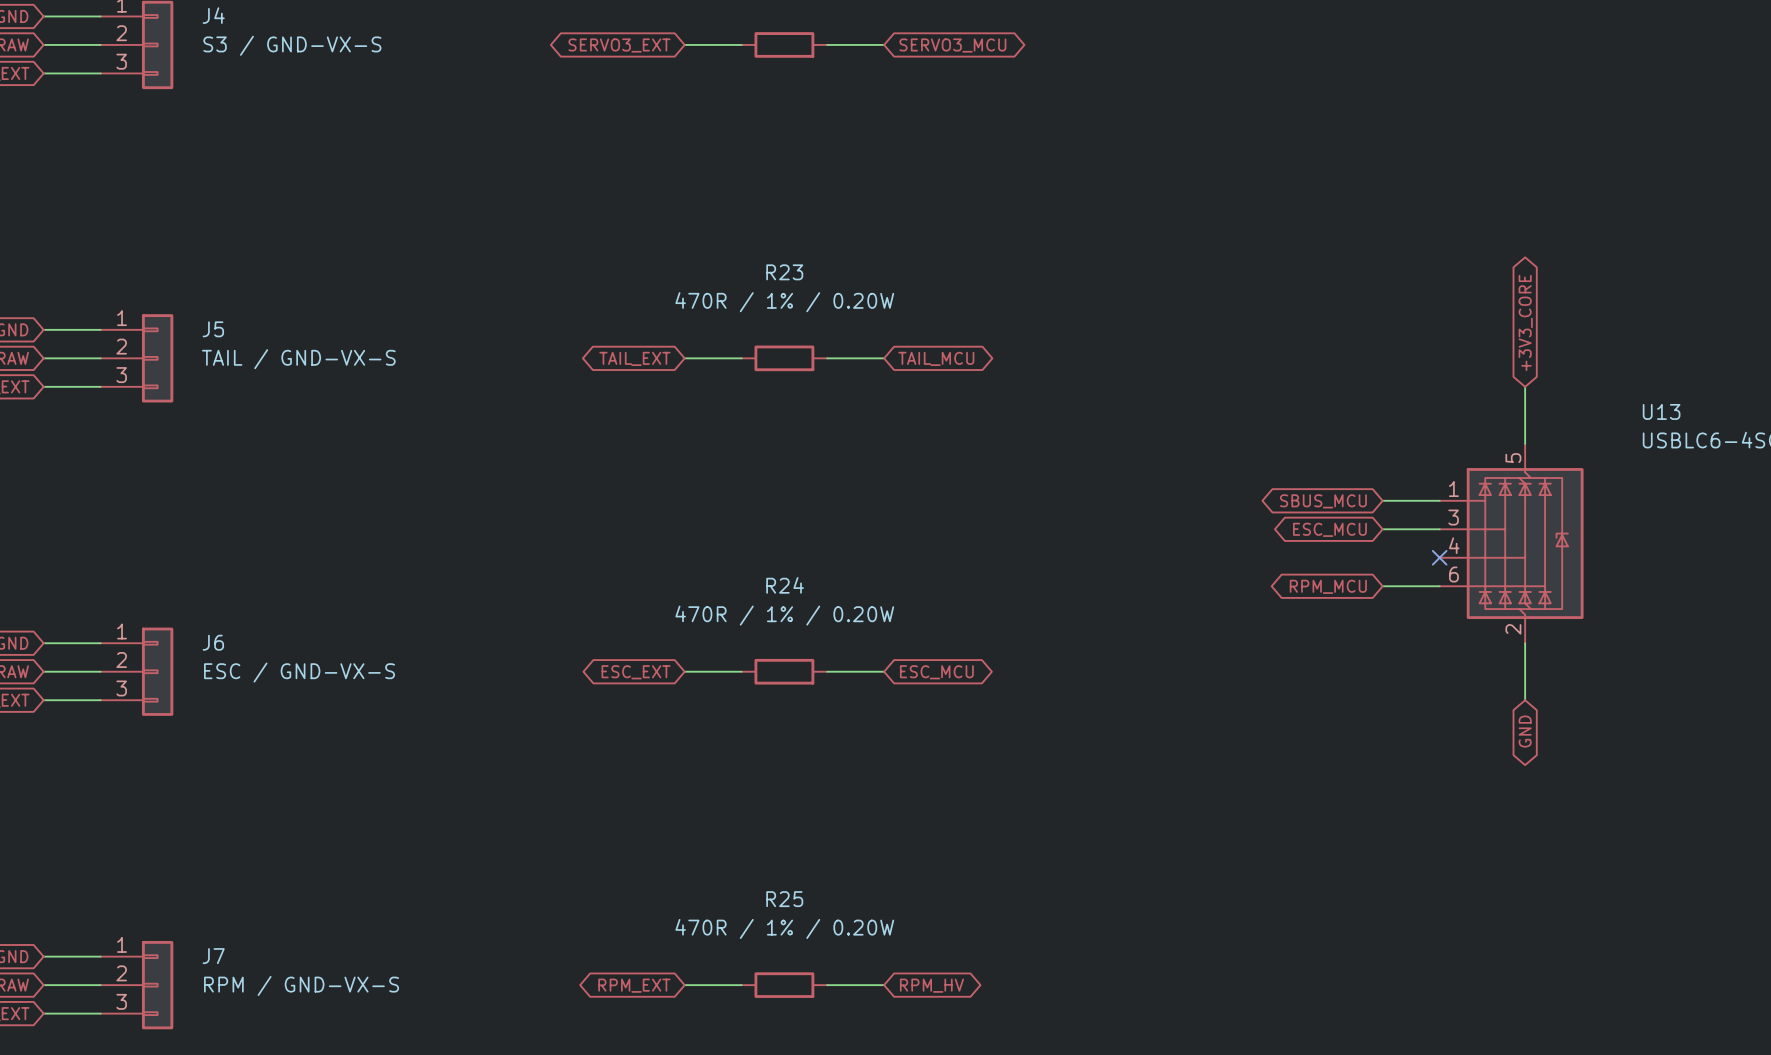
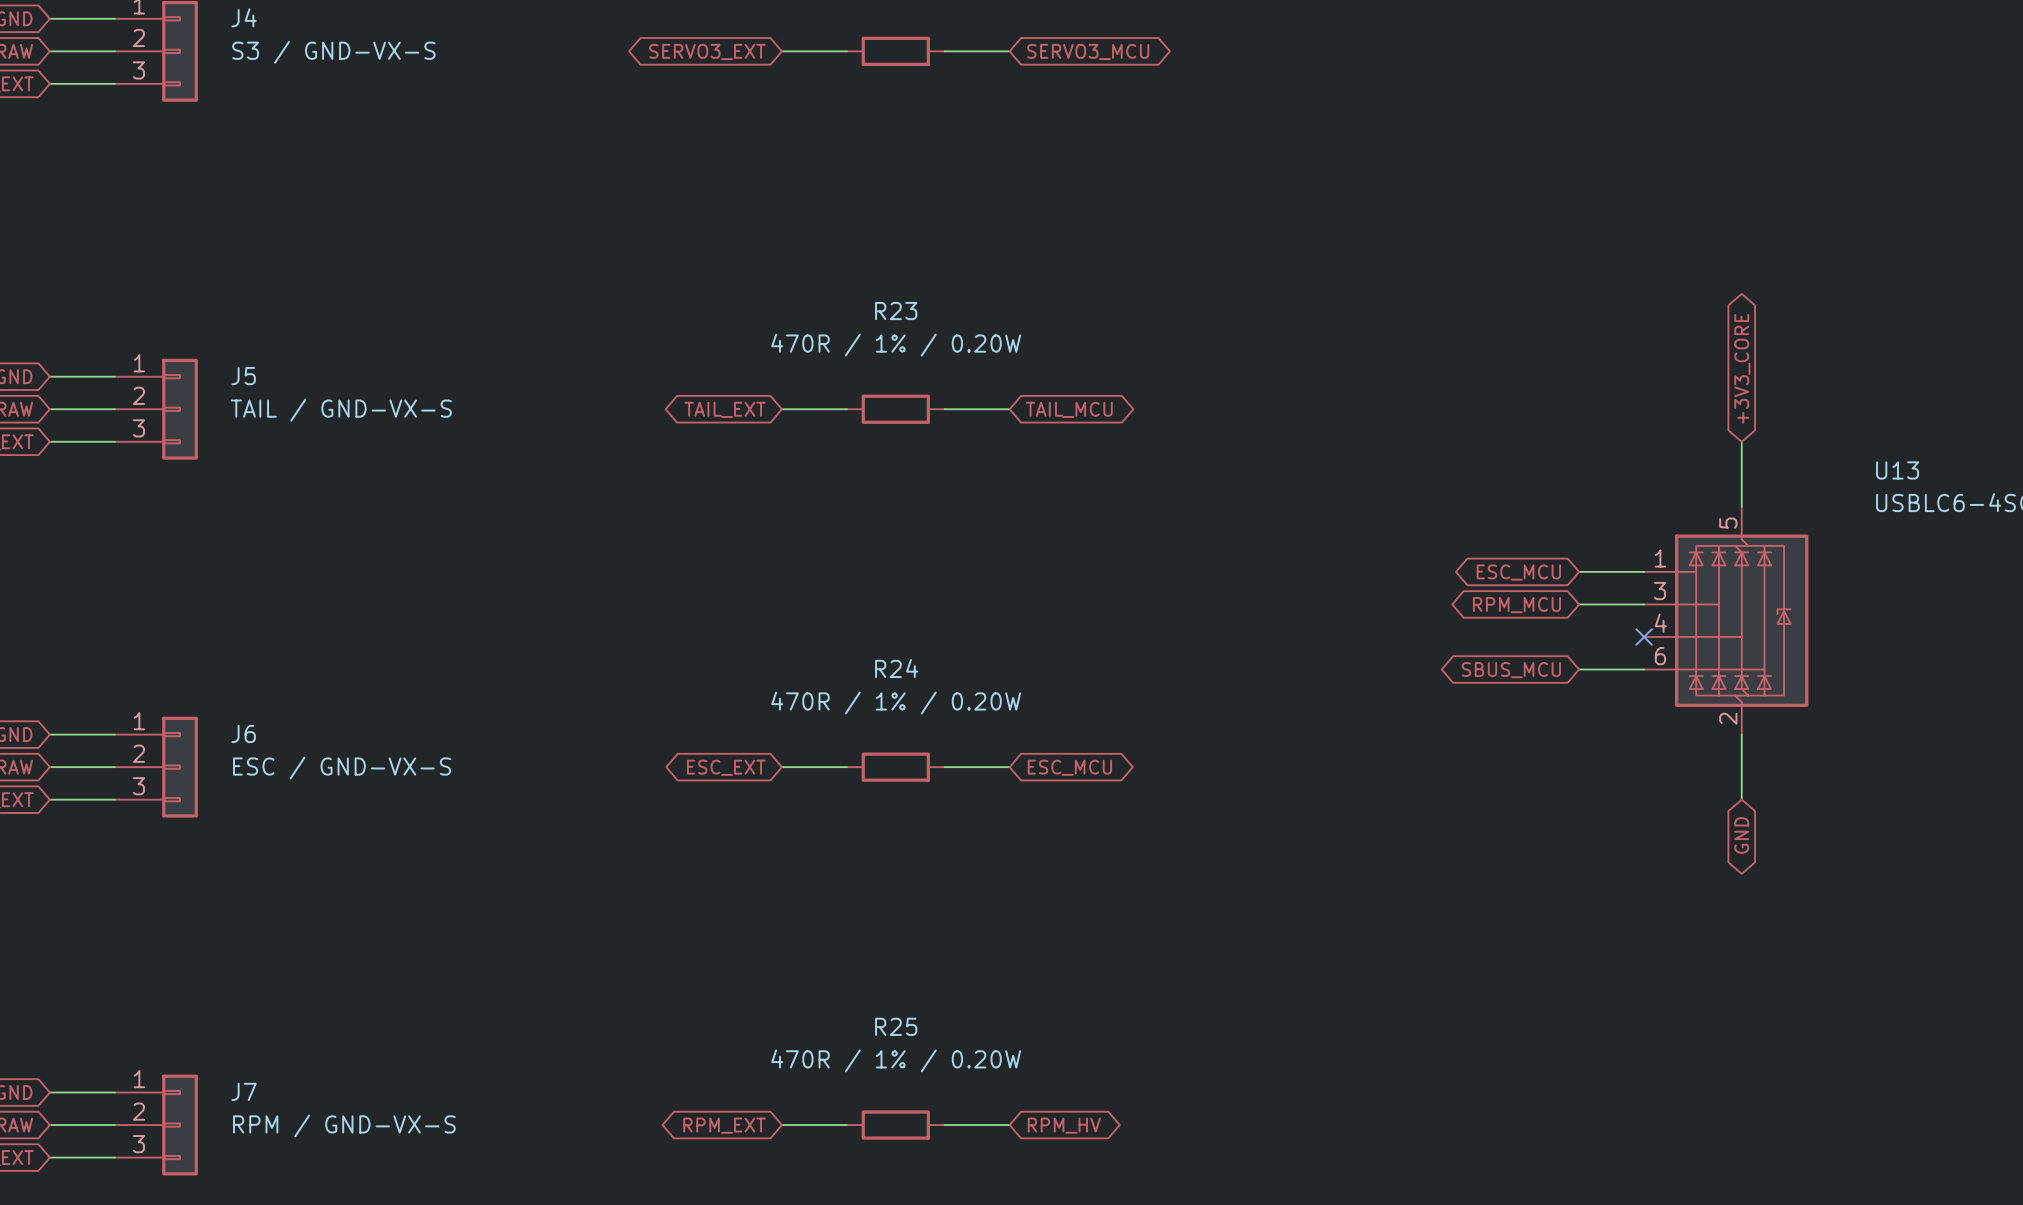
global label: SBUS_MCU (1323, 501) -> ESC_MCU (1518, 572)
global label: ESC_MCU (1329, 529) -> RPM_MCU (1516, 605)
global label: RPM_MCU (1328, 586) -> SBUS_MCU (1511, 670)

